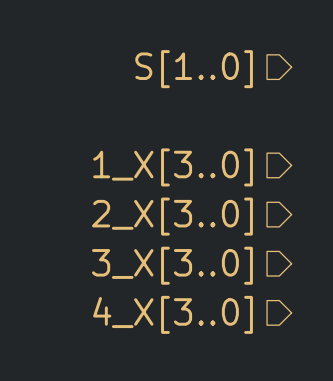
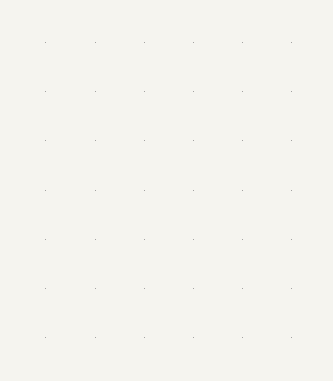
hierarchical label: S[1..0] (194, 69) -> none
hierarchical label: 1_X[3..0] (173, 167) -> none
hierarchical label: 2_X[3..0] (172, 216) -> none
hierarchical label: 3_X[3..0] (172, 265) -> none
hierarchical label: 4_X[3..0] (173, 314) -> none

